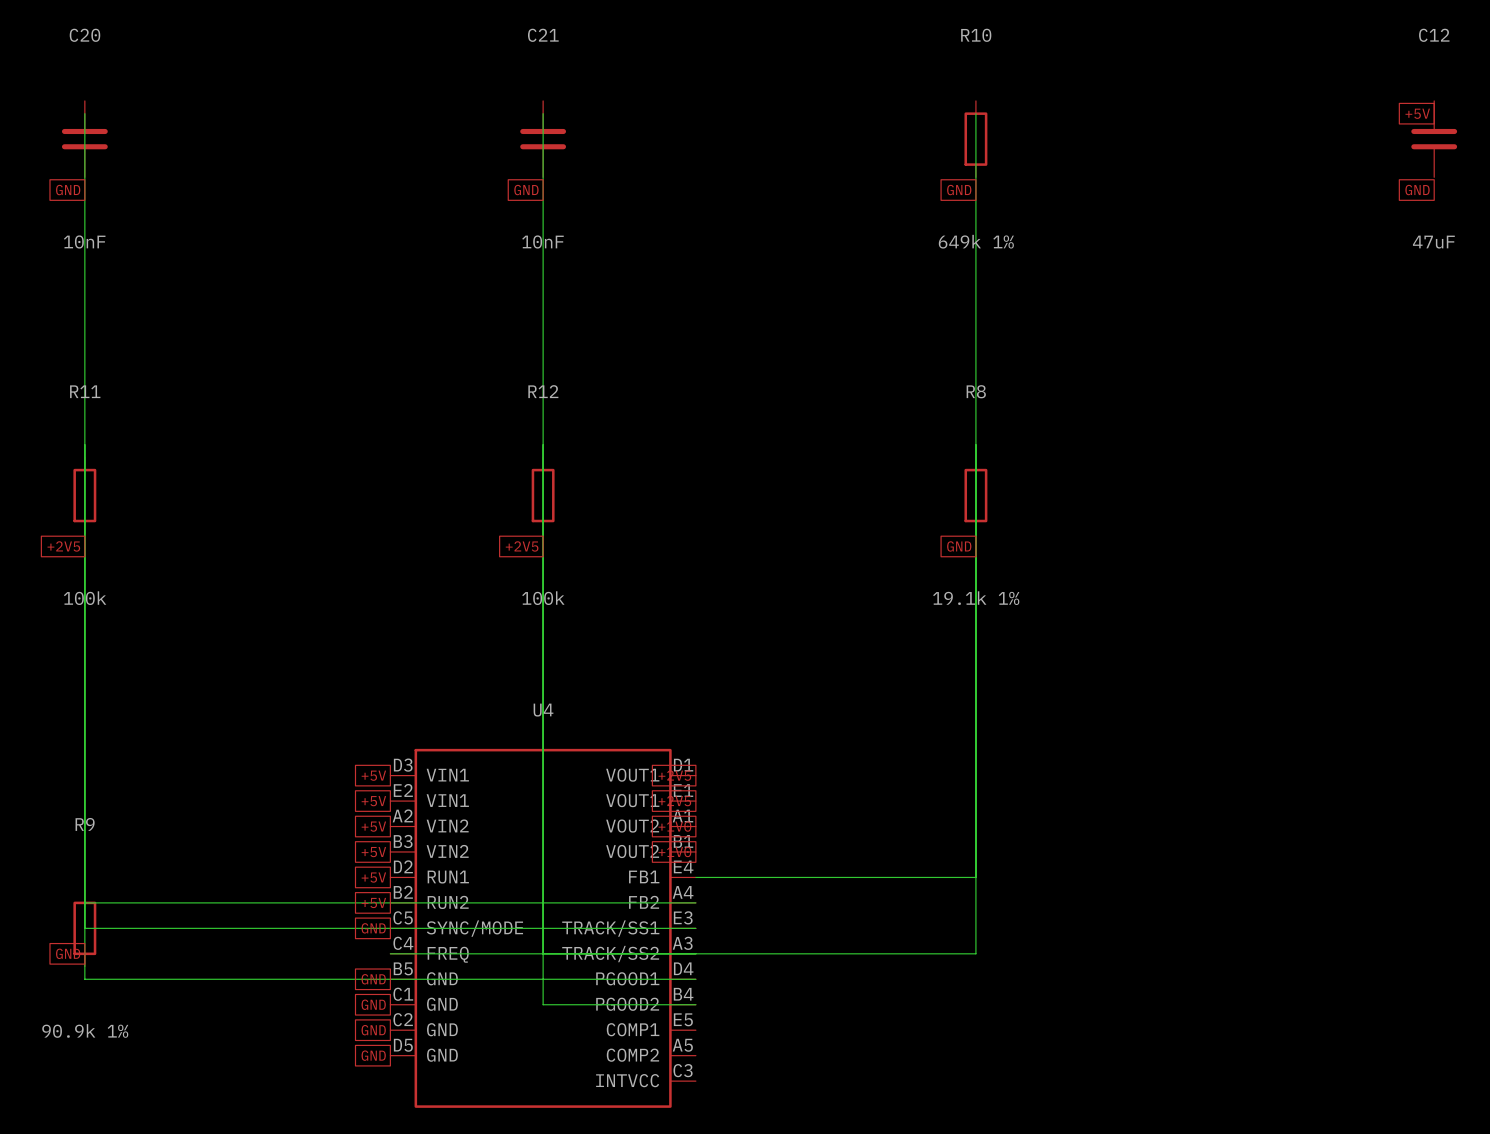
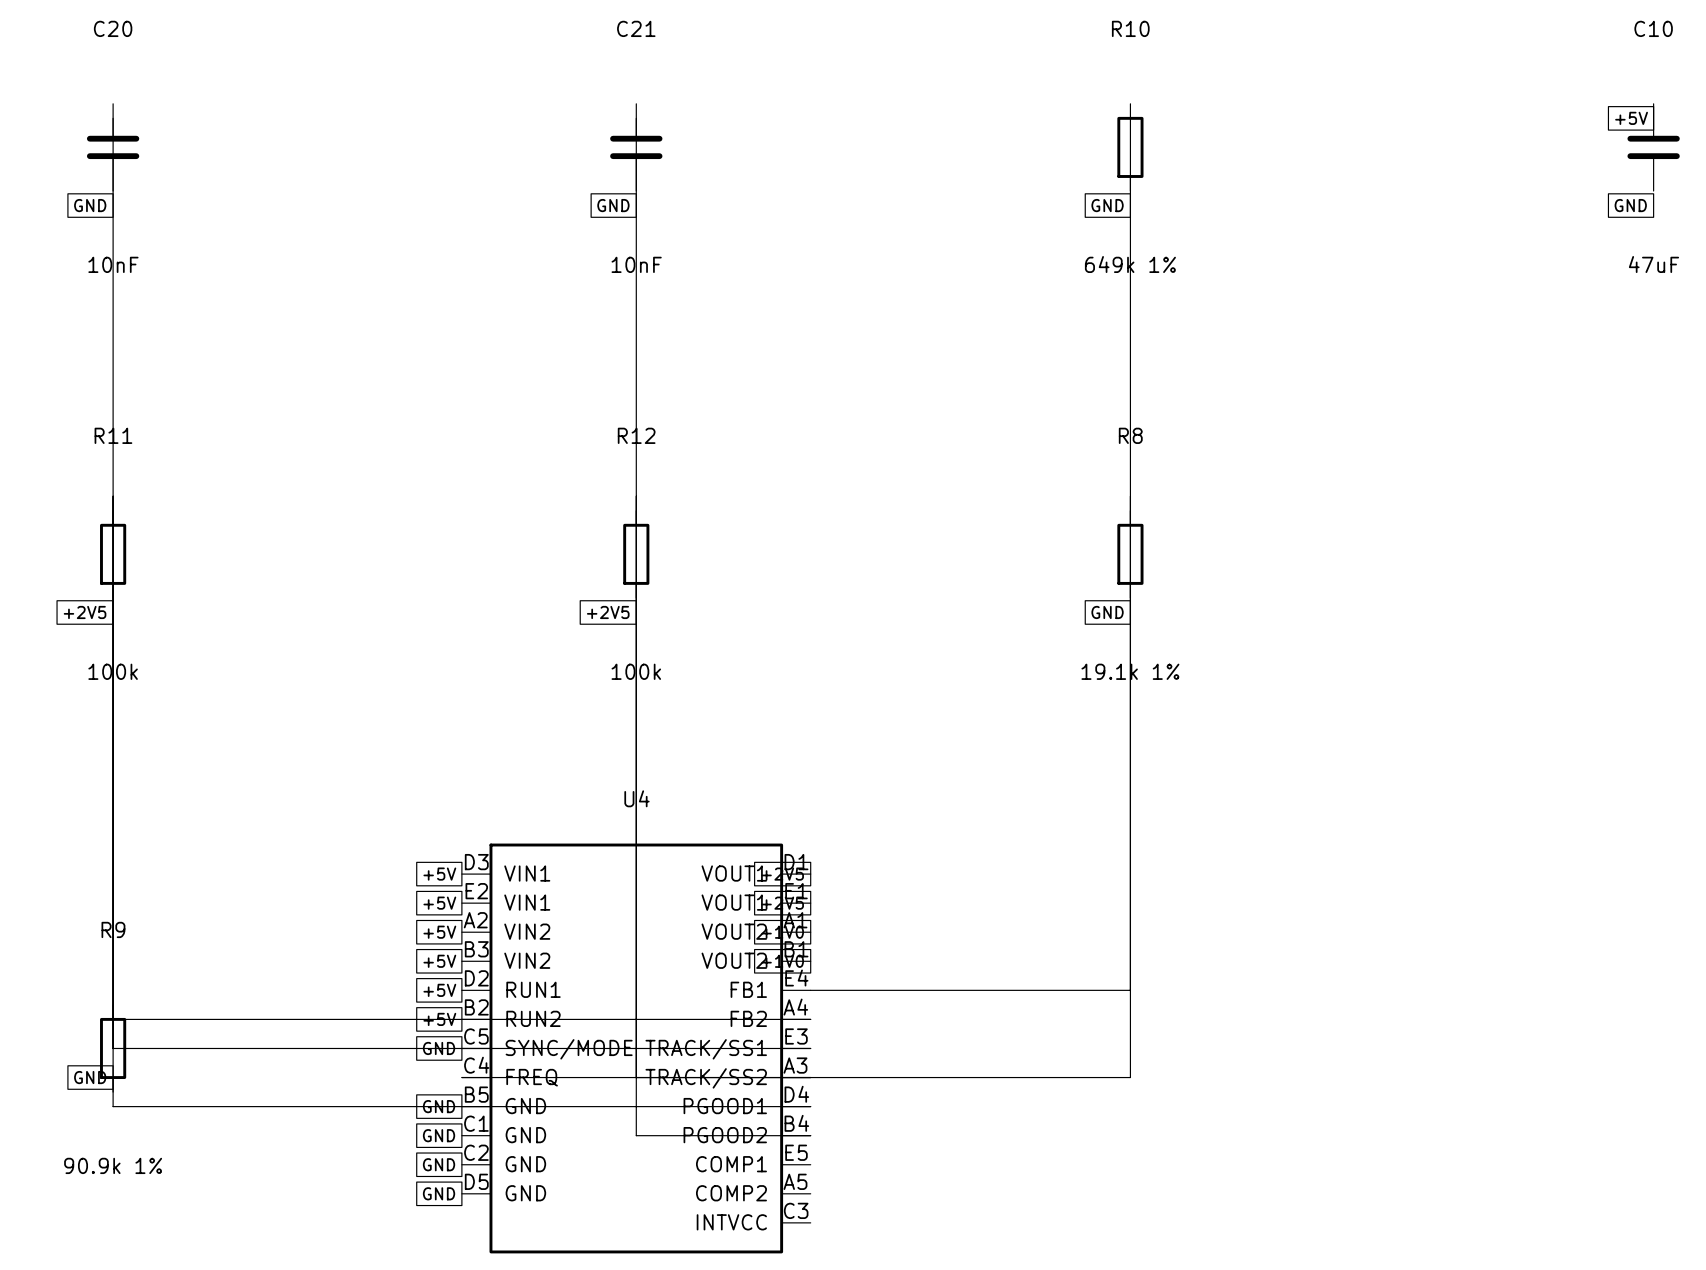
C12 name: C12 (1434, 35) -> C10 (1653, 28)

